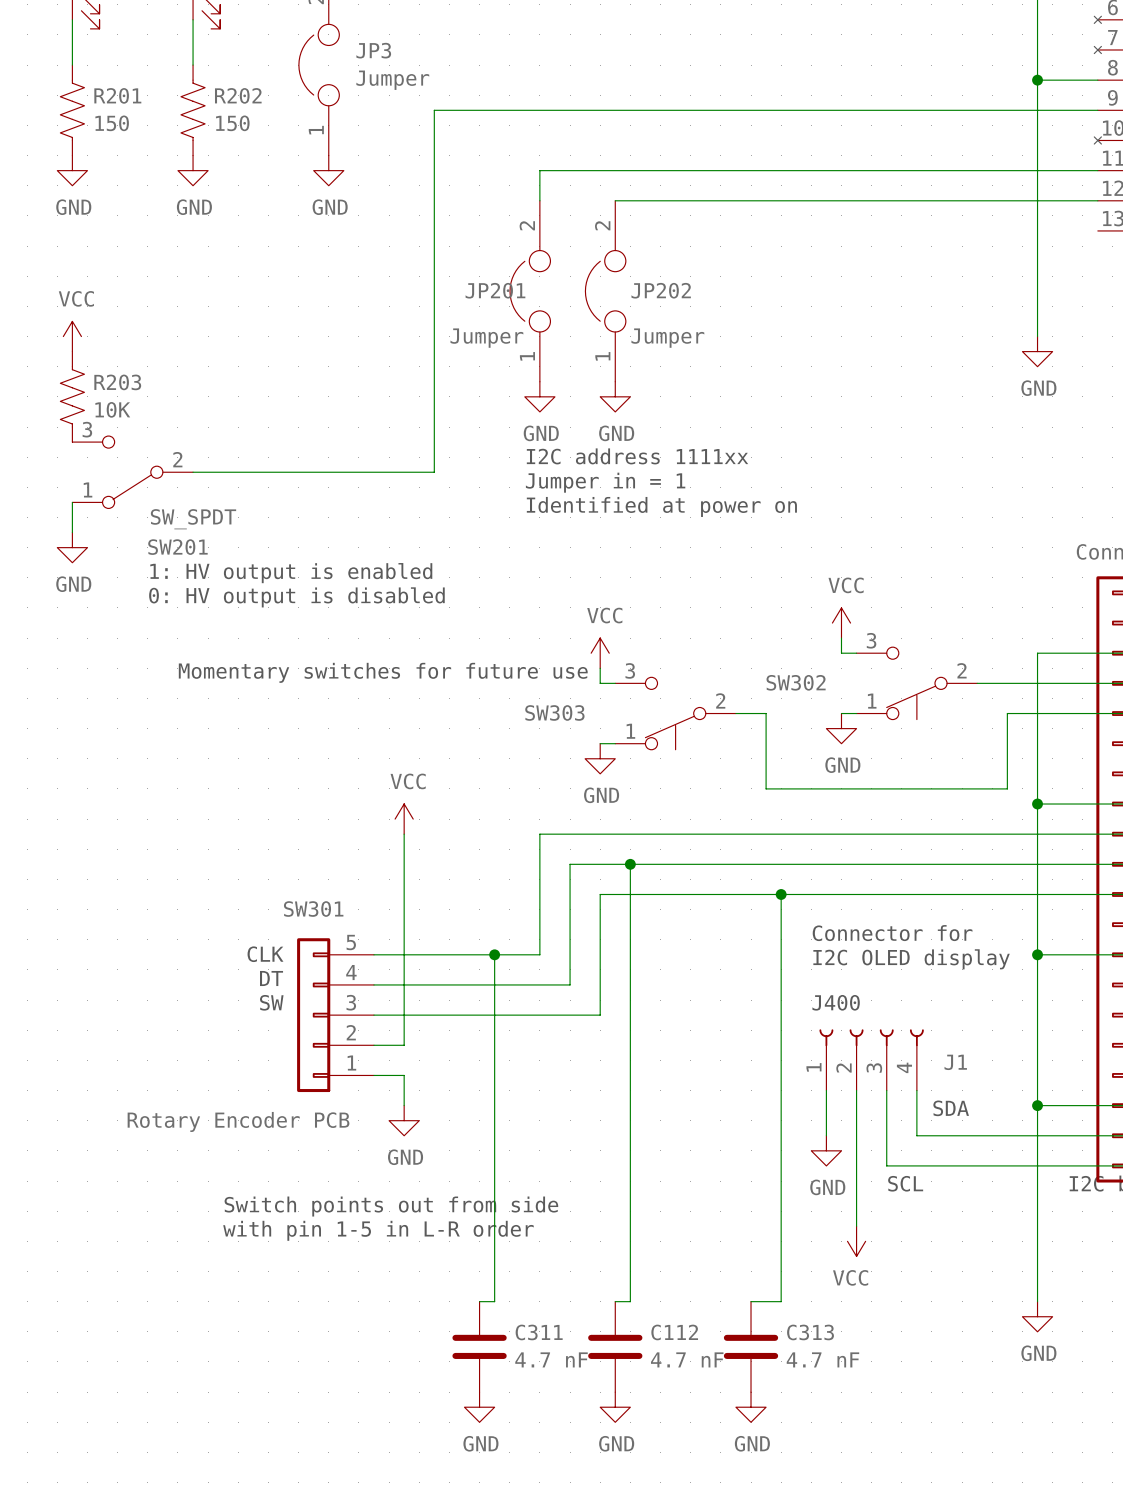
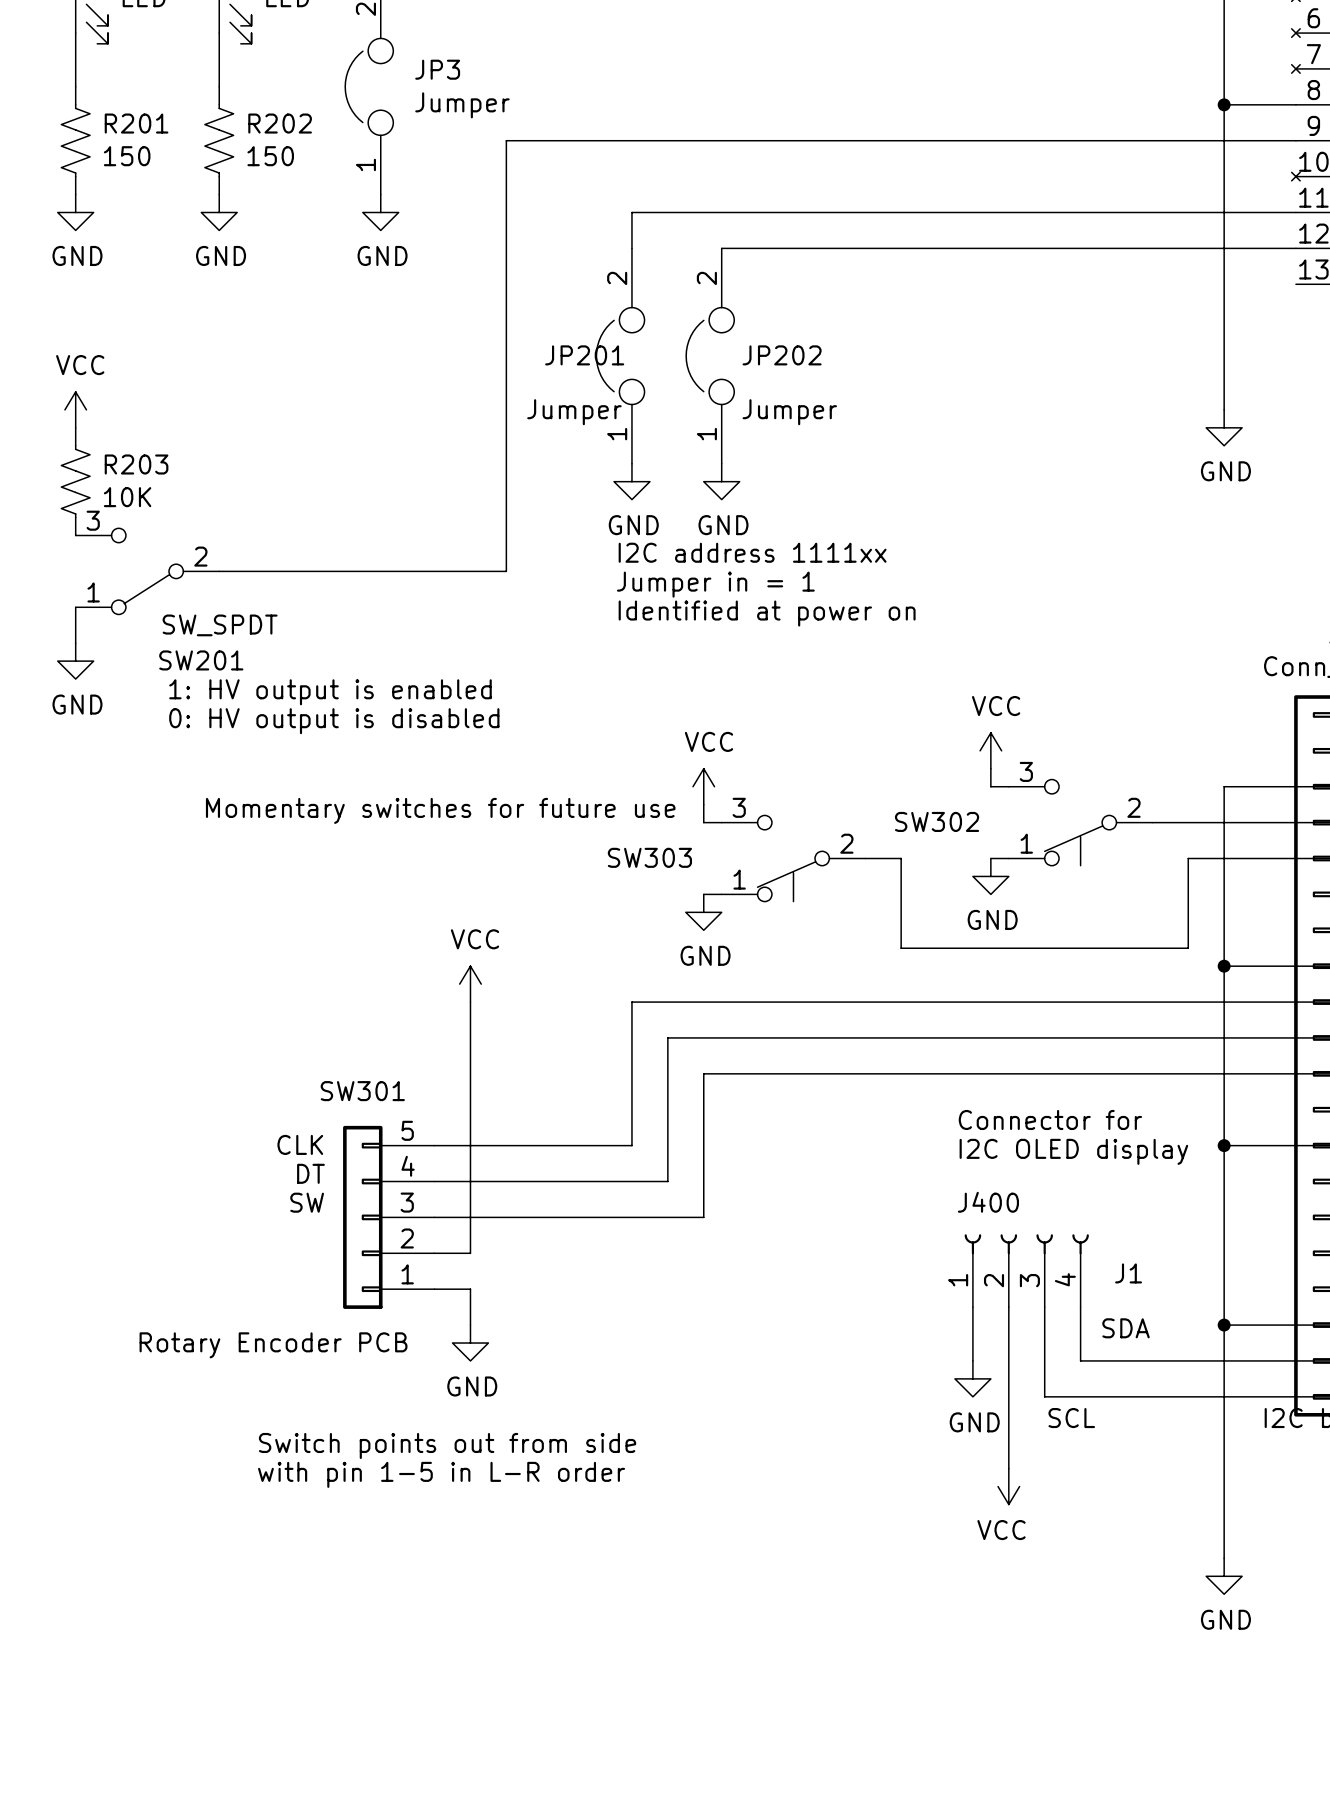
wire: (630, 864) (630, 1301) (615, 1301) -> none
junction: (630, 864) -> none
wire: (781, 894) (781, 1301) (751, 1301) -> none
junction: (781, 894) -> none
wire: (494, 954) (494, 1301) (479, 1301) -> none
junction: (494, 954) -> none
C311: 4.7 nF (479, 1346) -> none
C112: 4.7 nF (615, 1346) -> none
C313: 4.7 nF (751, 1346) -> none
power symbol: GND (479, 1407) -> none
power symbol: GND (615, 1407) -> none
power symbol: GND (751, 1407) -> none

